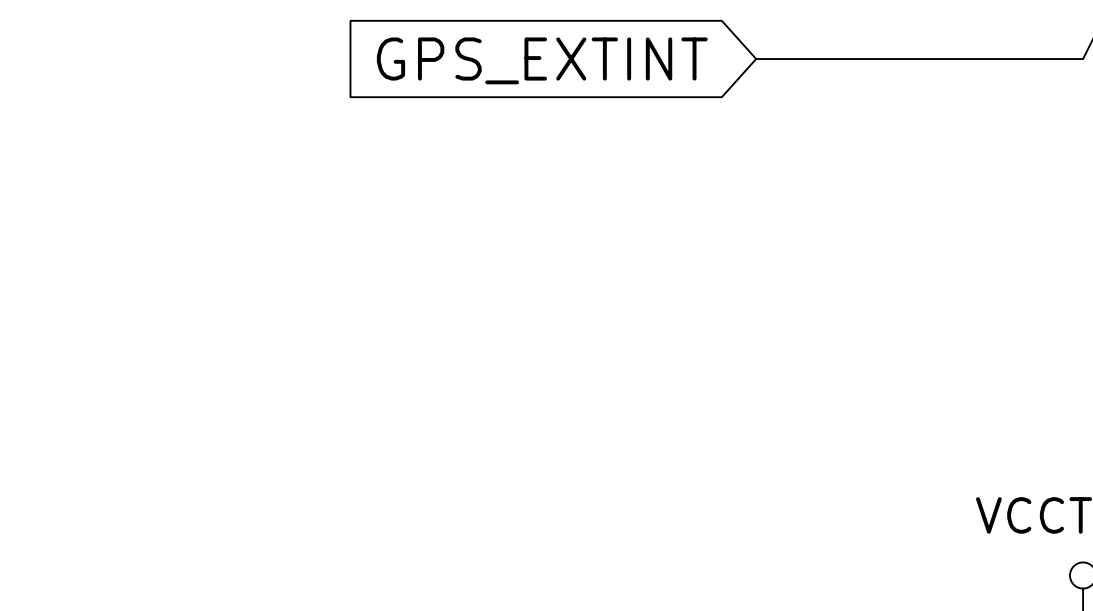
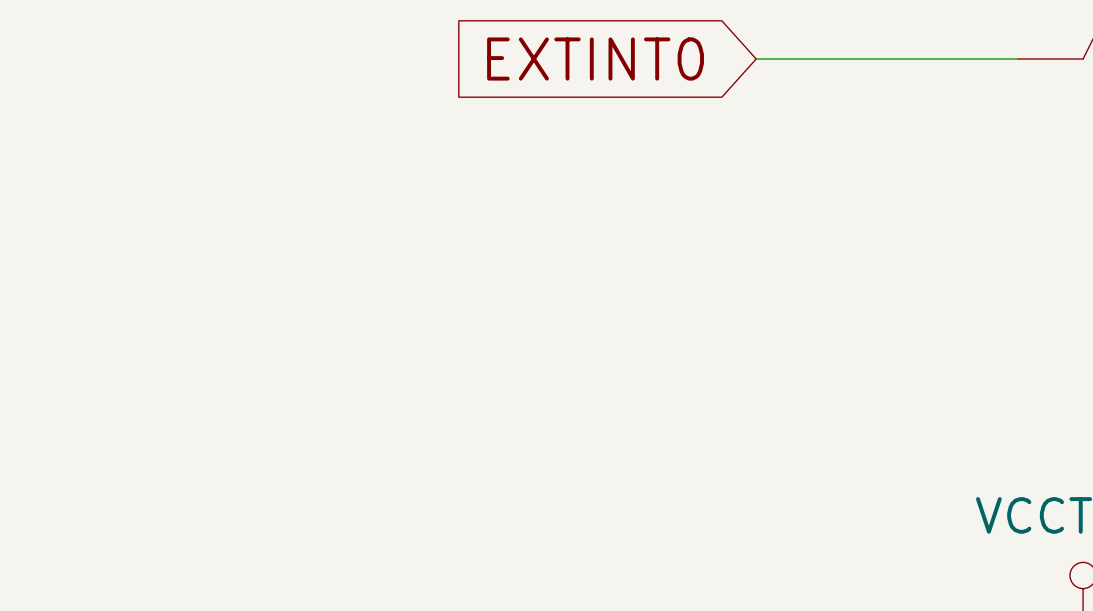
global label: GPS_EXTINT (542, 60) -> EXTINT0 (595, 59)

